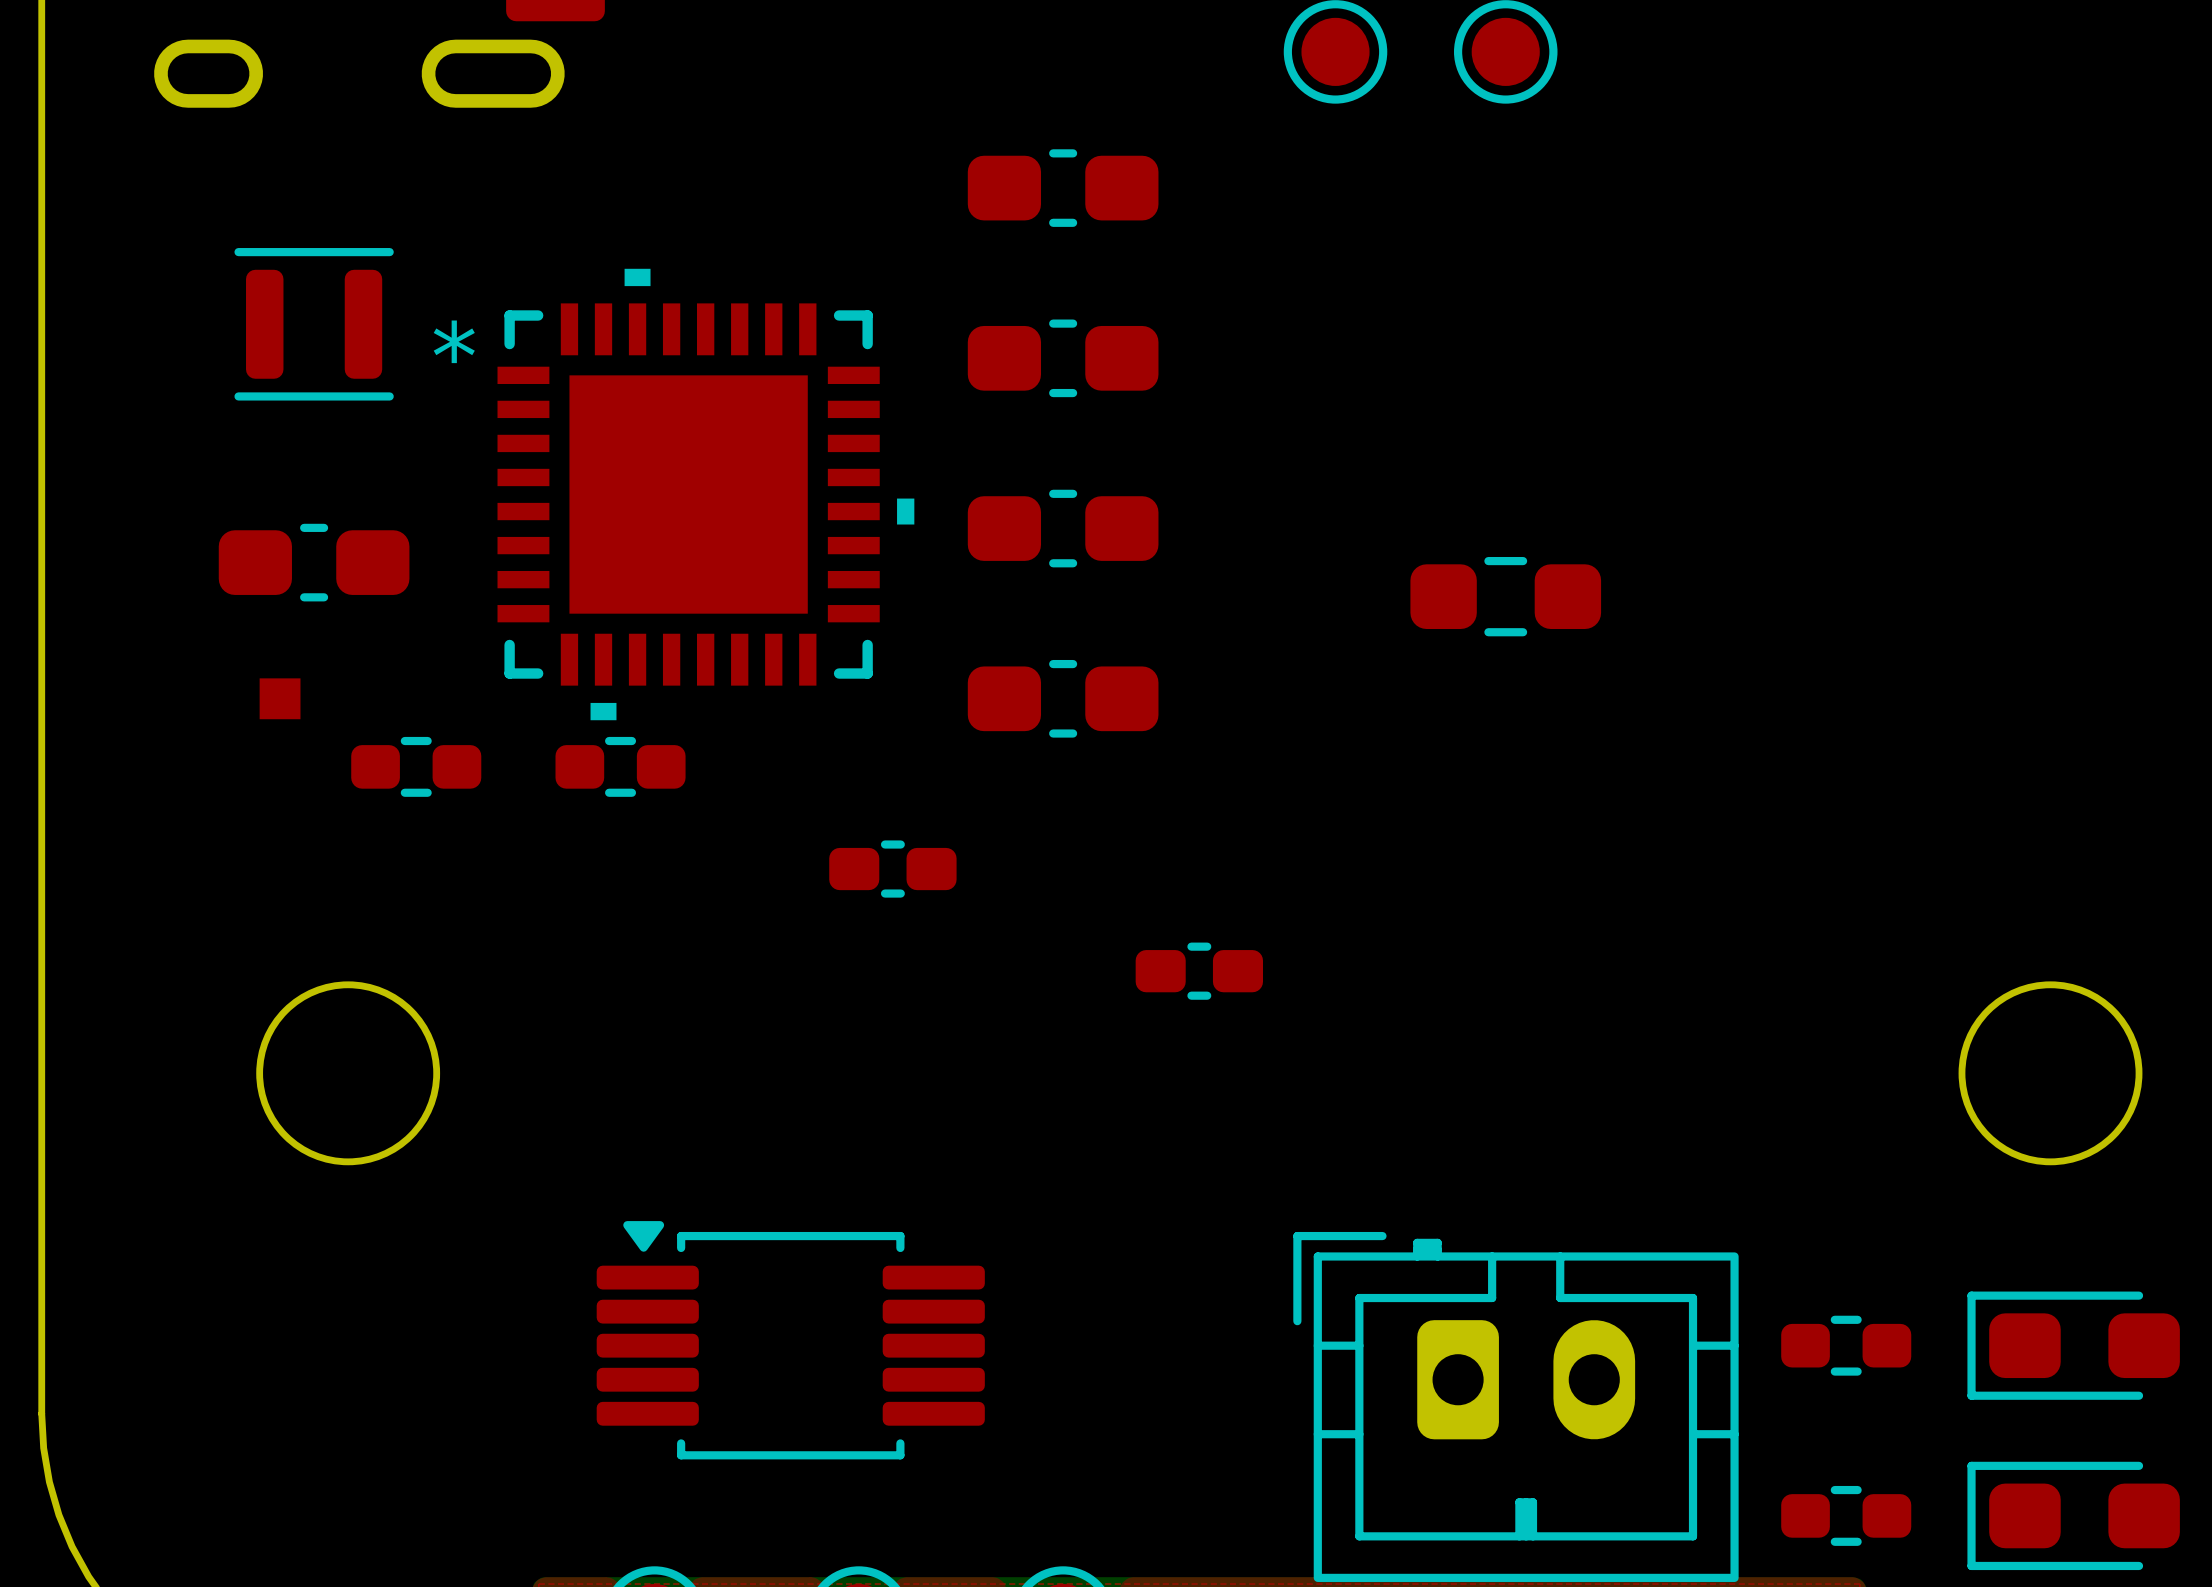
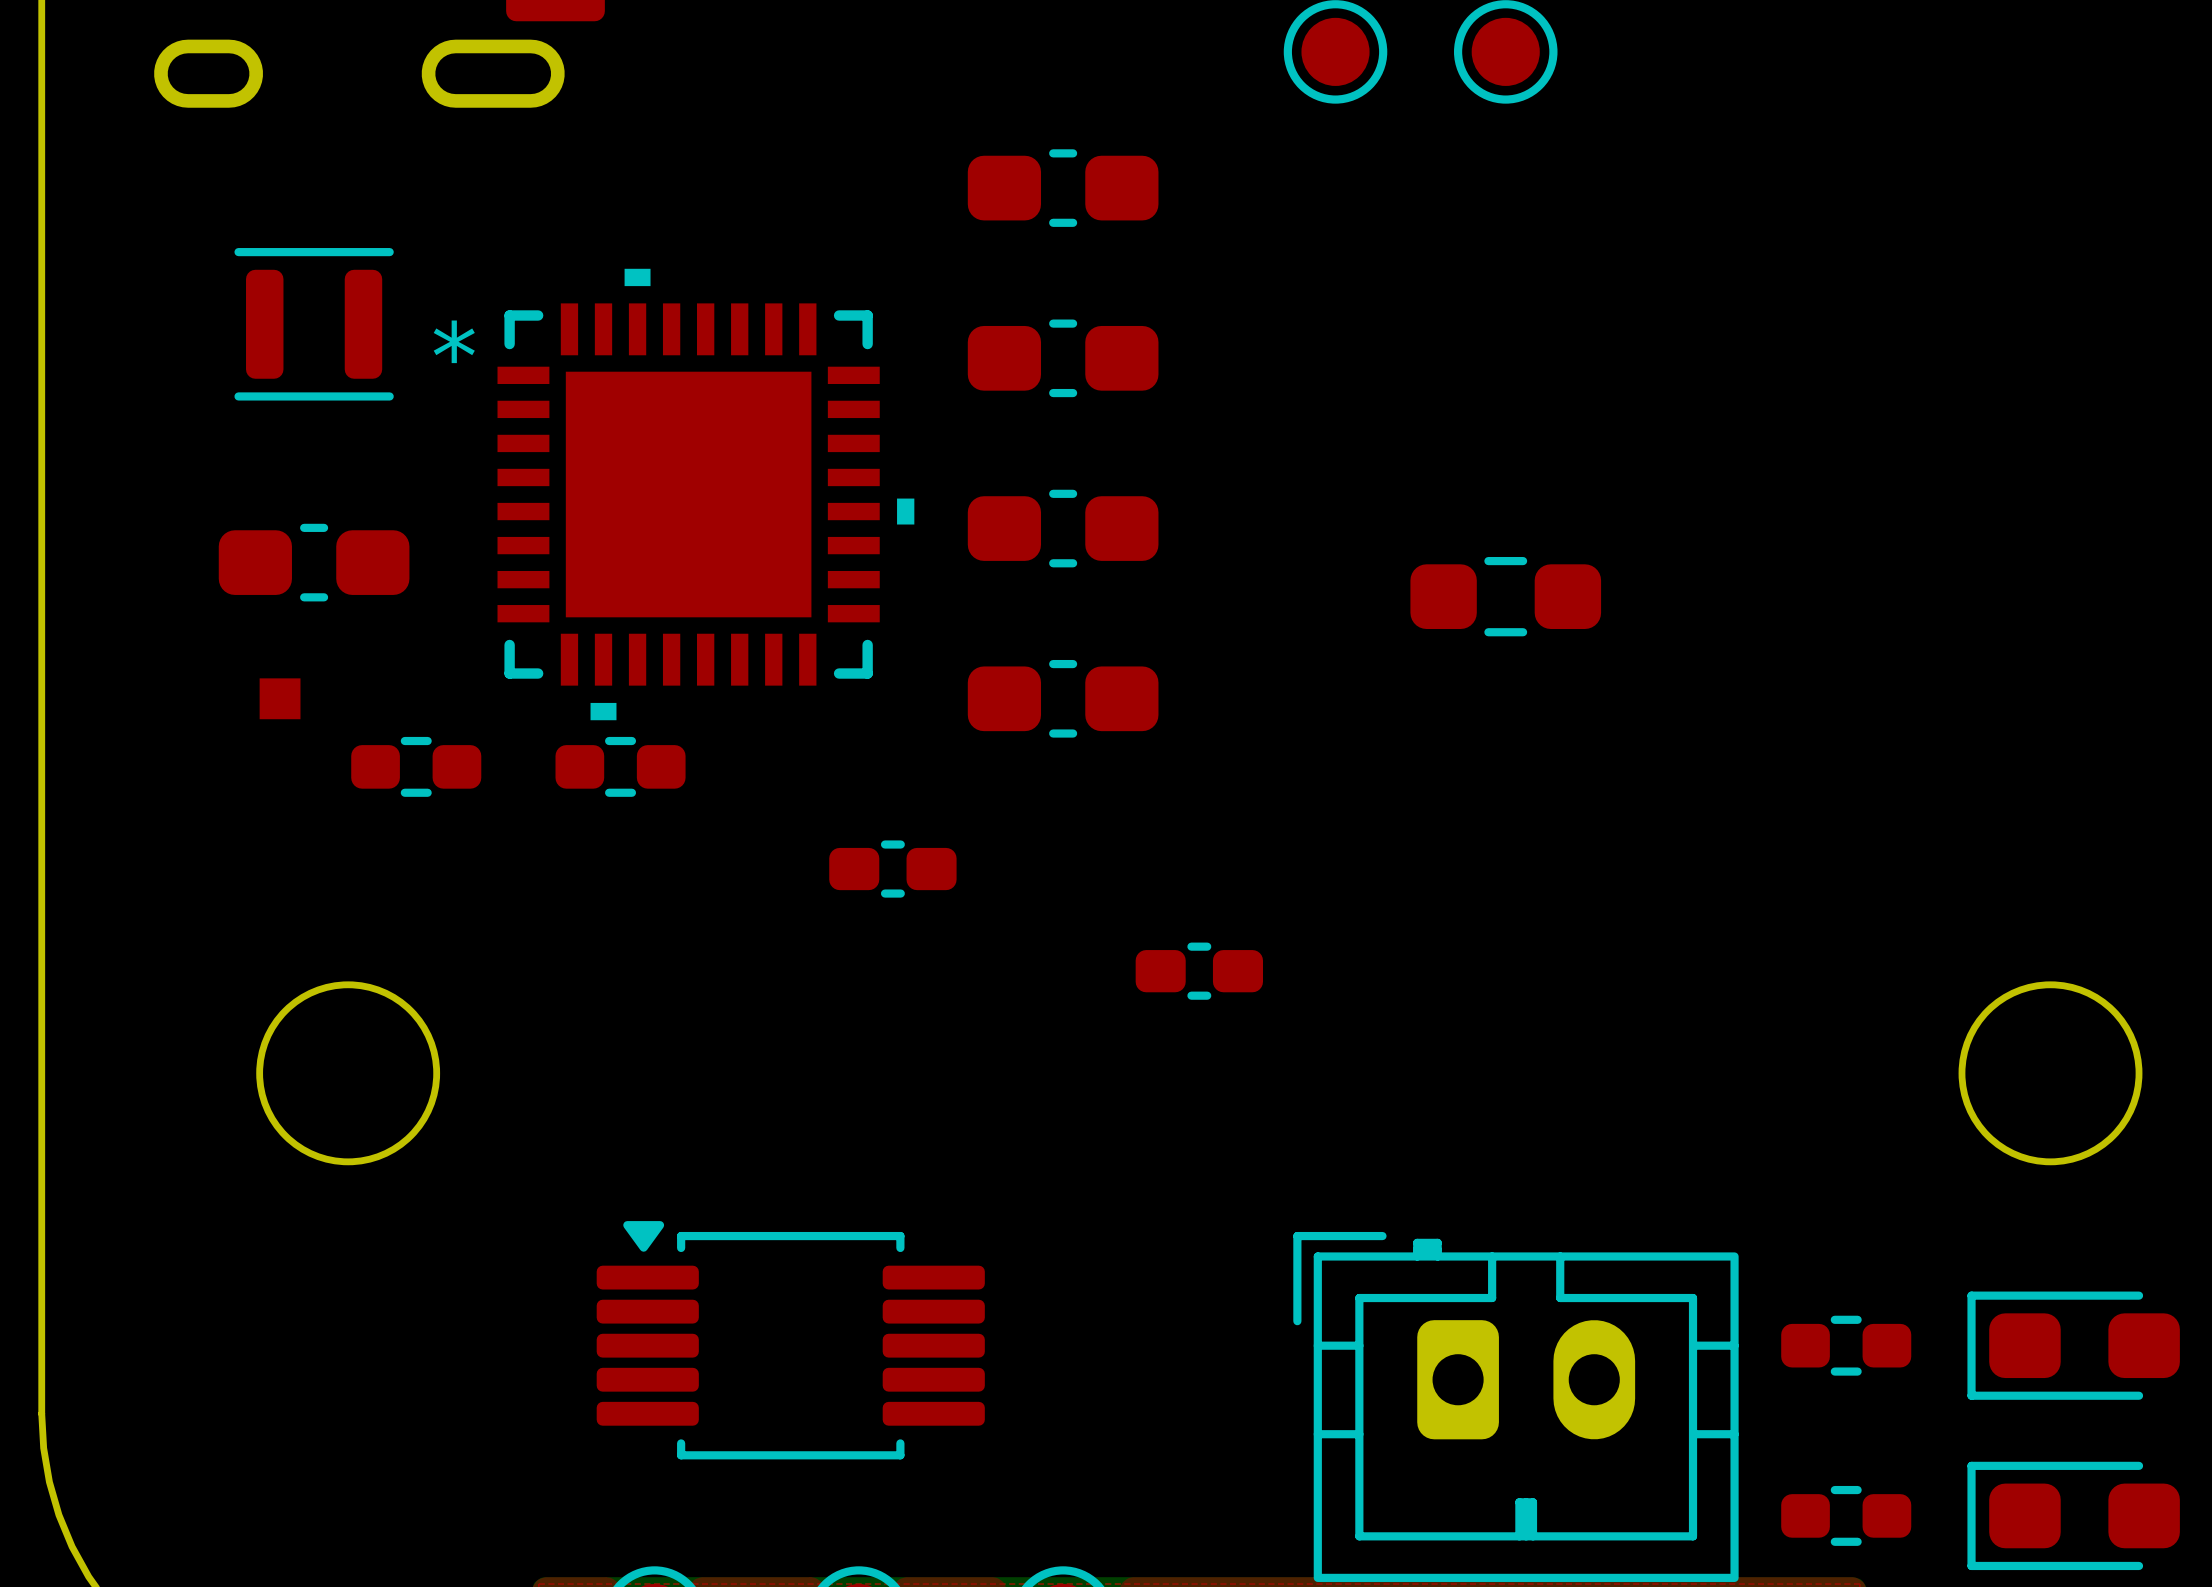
part footprint: [497, 268, 915, 721] -> [497, 268, 915, 721]

